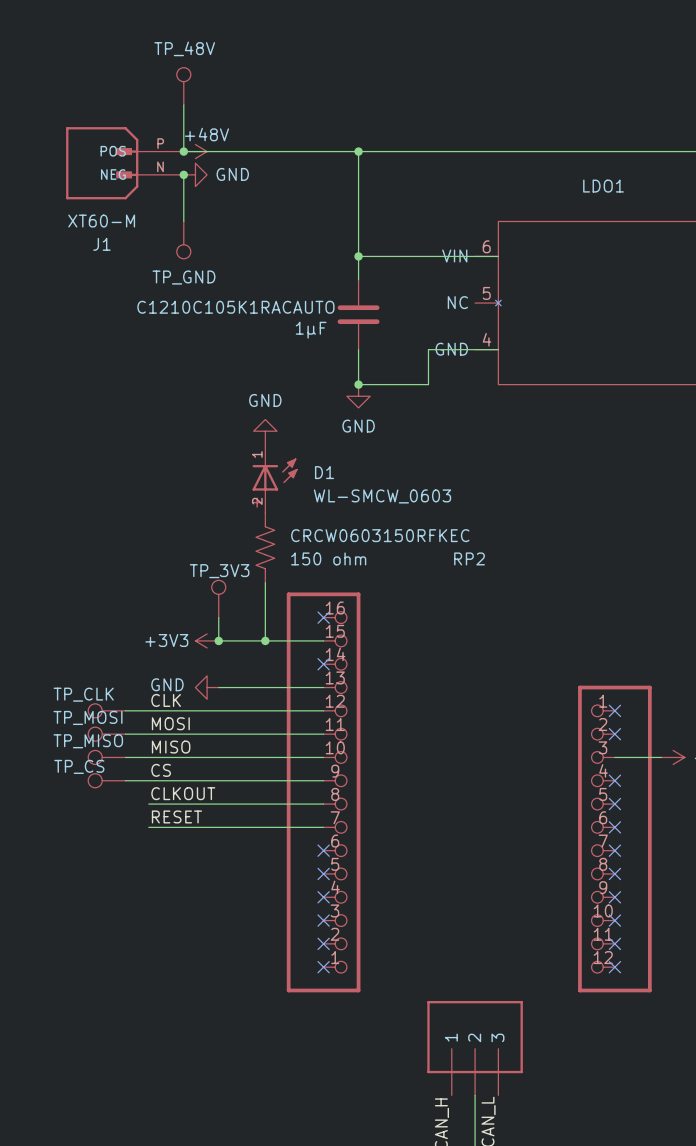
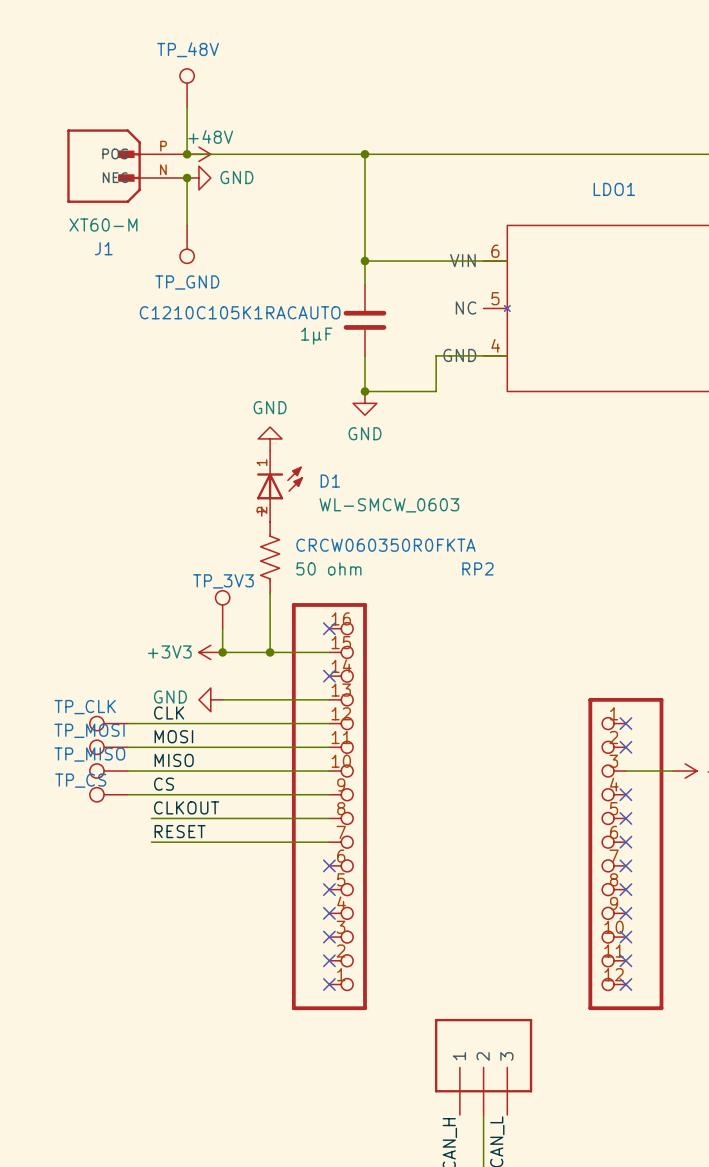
CRCW0603150RFKEC name: CRCW0603150RFKEC (380, 535) -> CRCW060350R0FKTA (385, 545)
CRCW0603150RFKEC value: 150 ohm (328, 558) -> 50 ohm (328, 568)

